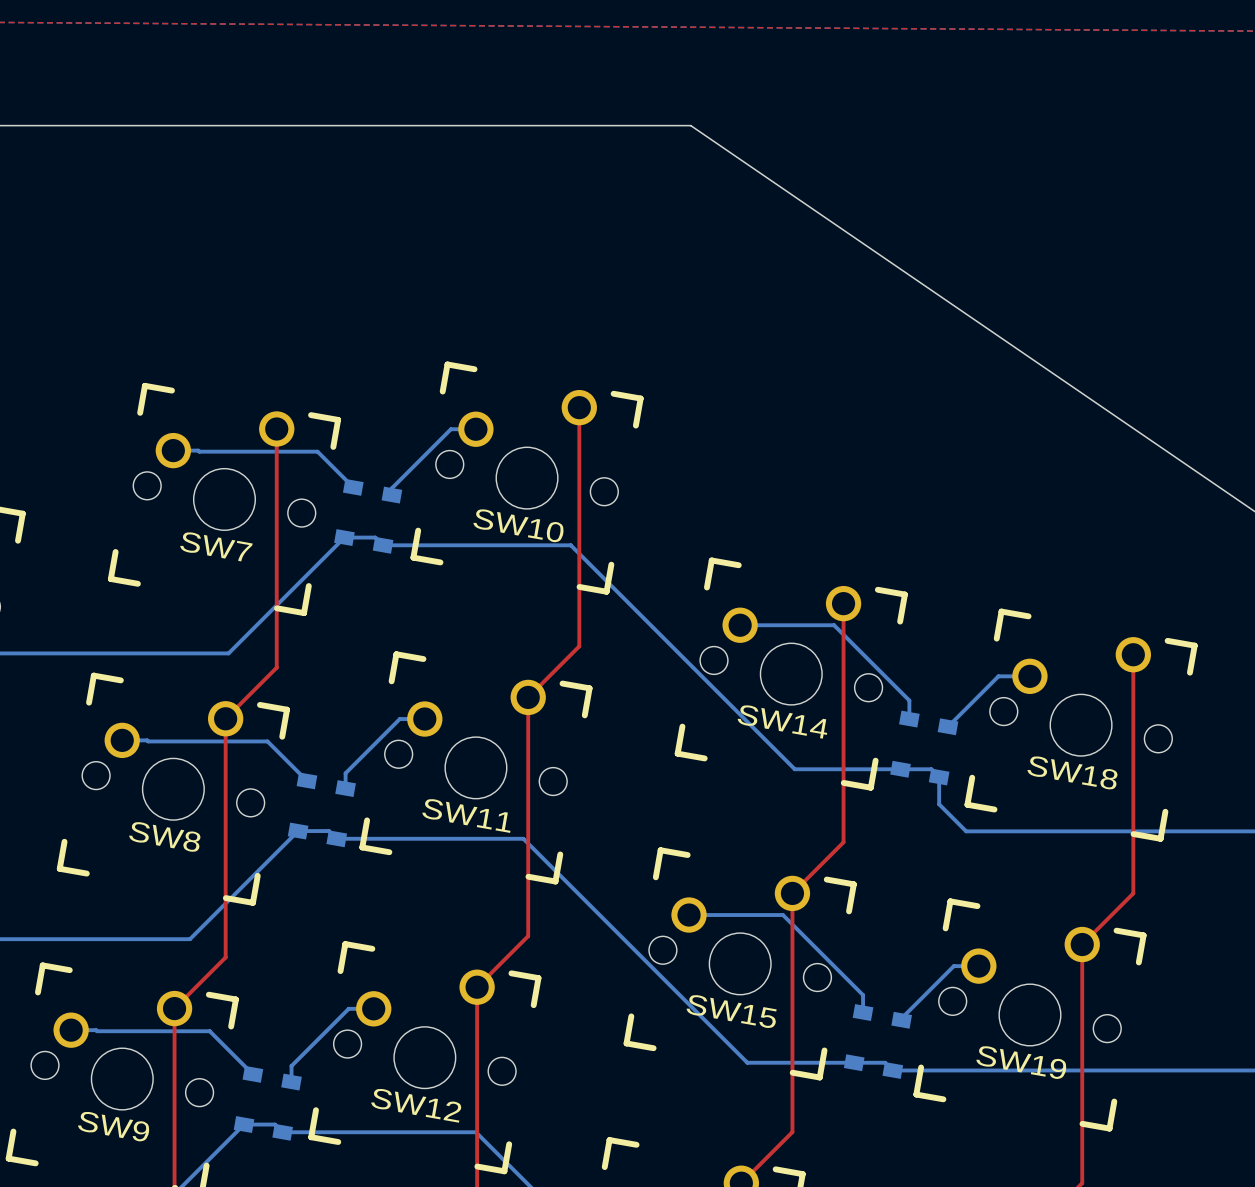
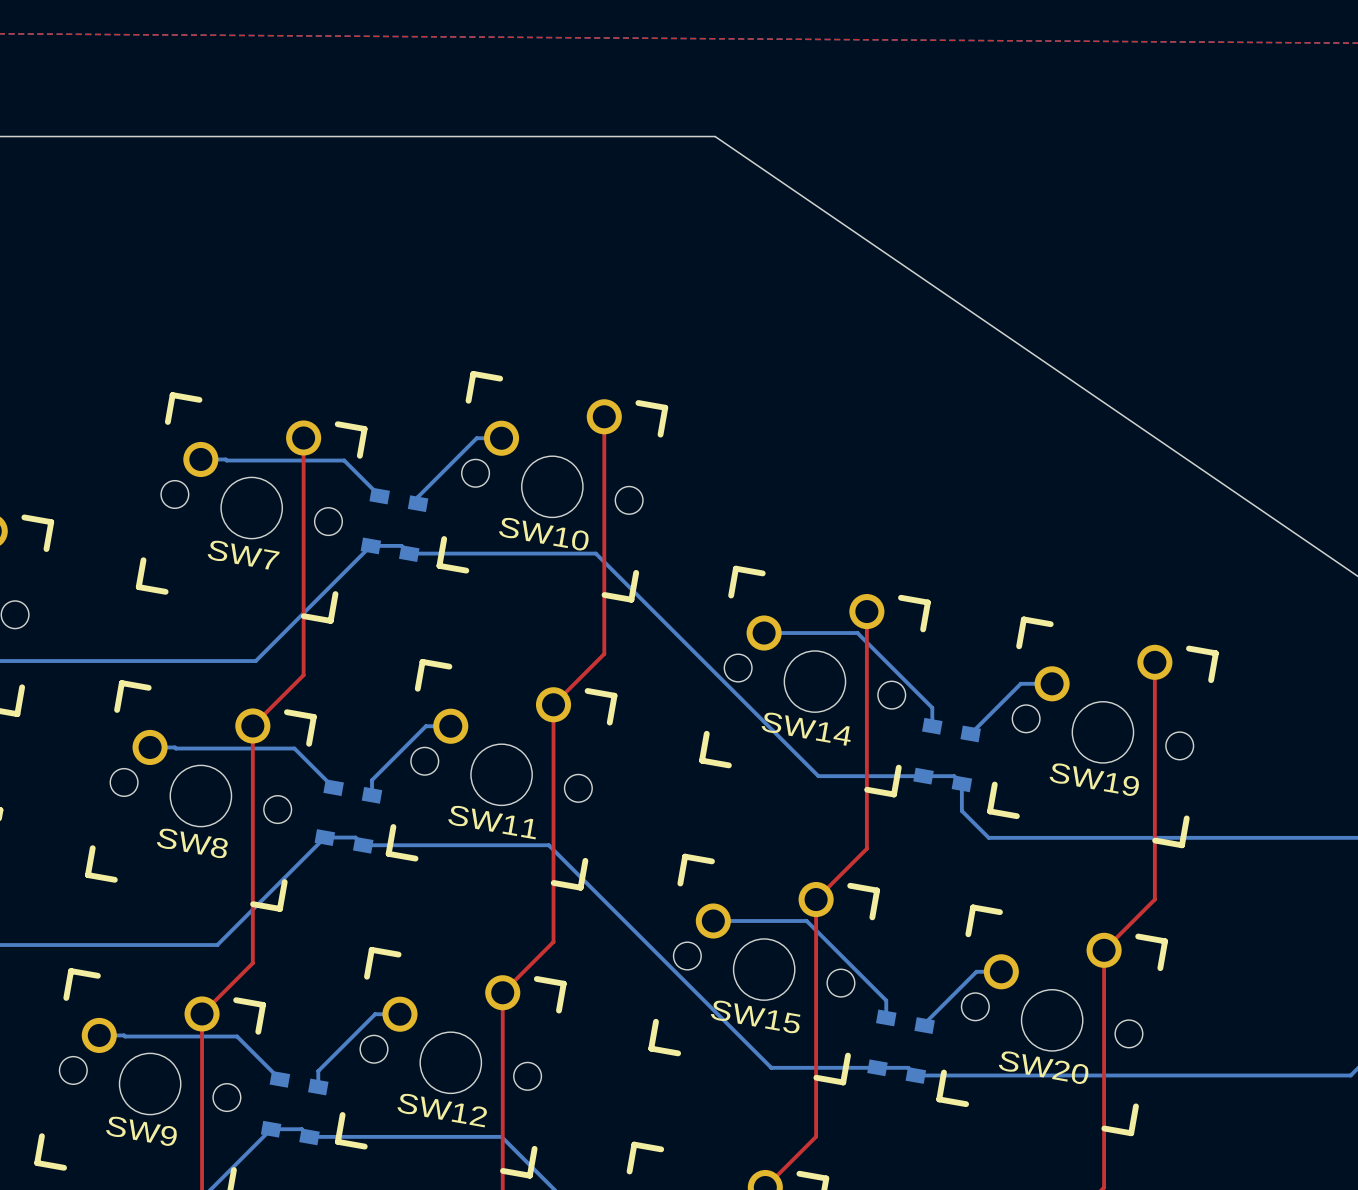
SW18 name: SW18 (1072, 772) -> SW19 (1094, 779)
SW19 name: SW19 (1021, 1062) -> SW20 (1043, 1067)

